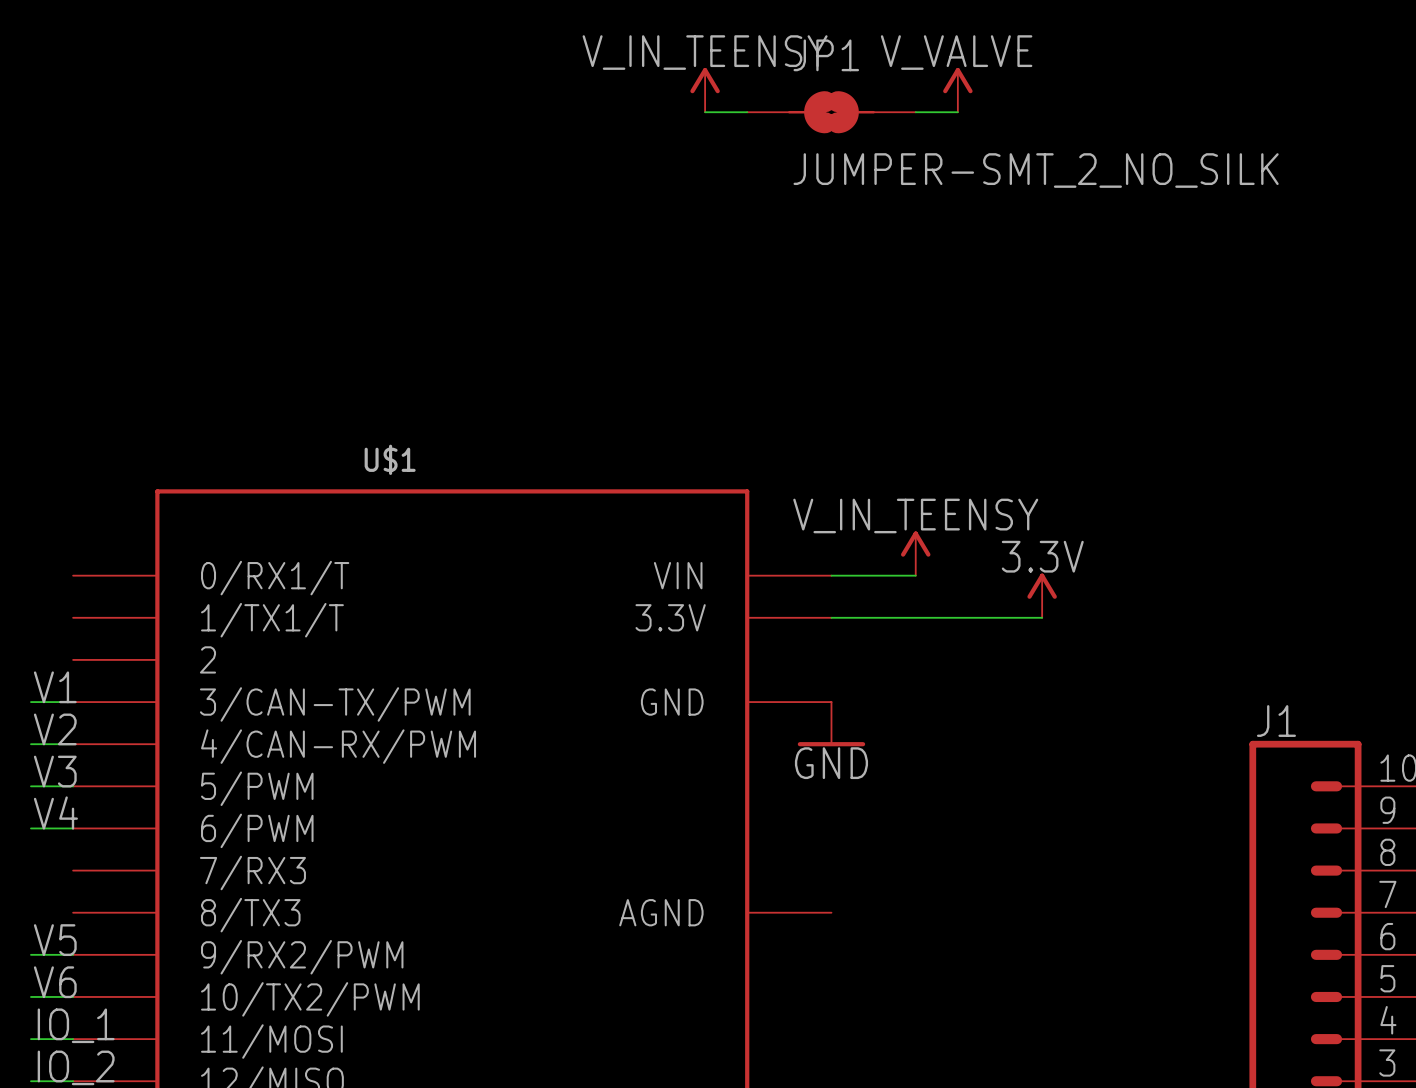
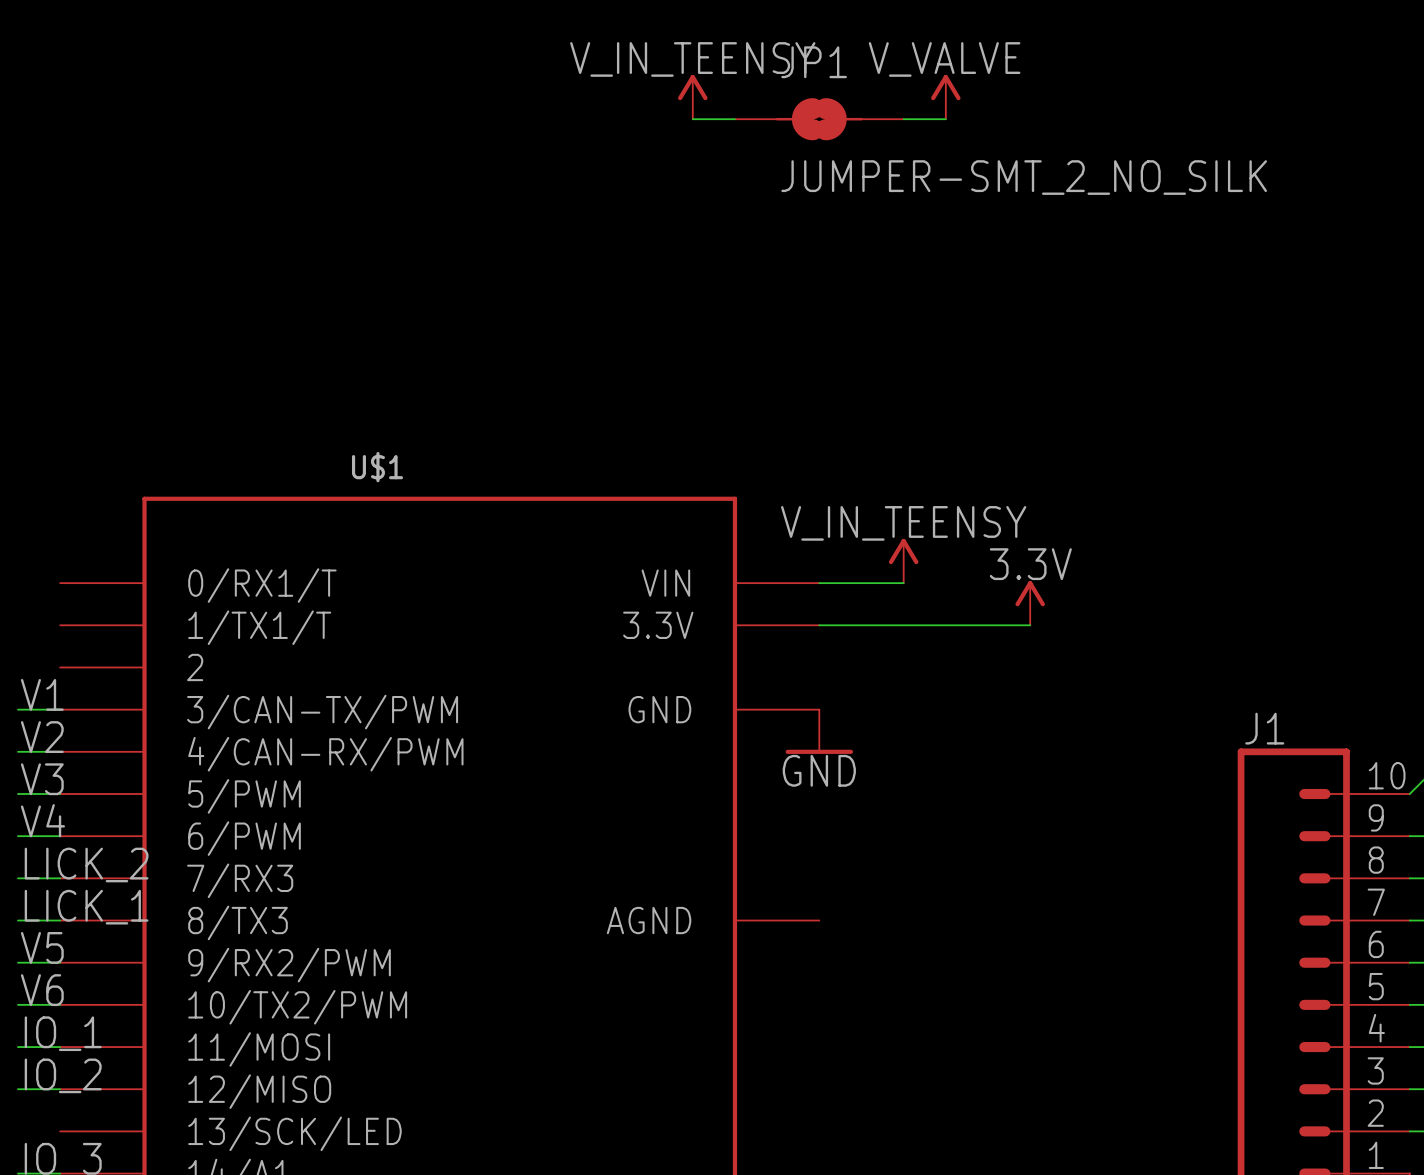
label: none -> LICK_2 (86, 864)
wire: none -> (17, 878) (60, 878)
label: none -> LICK_1 (86, 907)
wire: none -> (17, 920) (60, 920)

